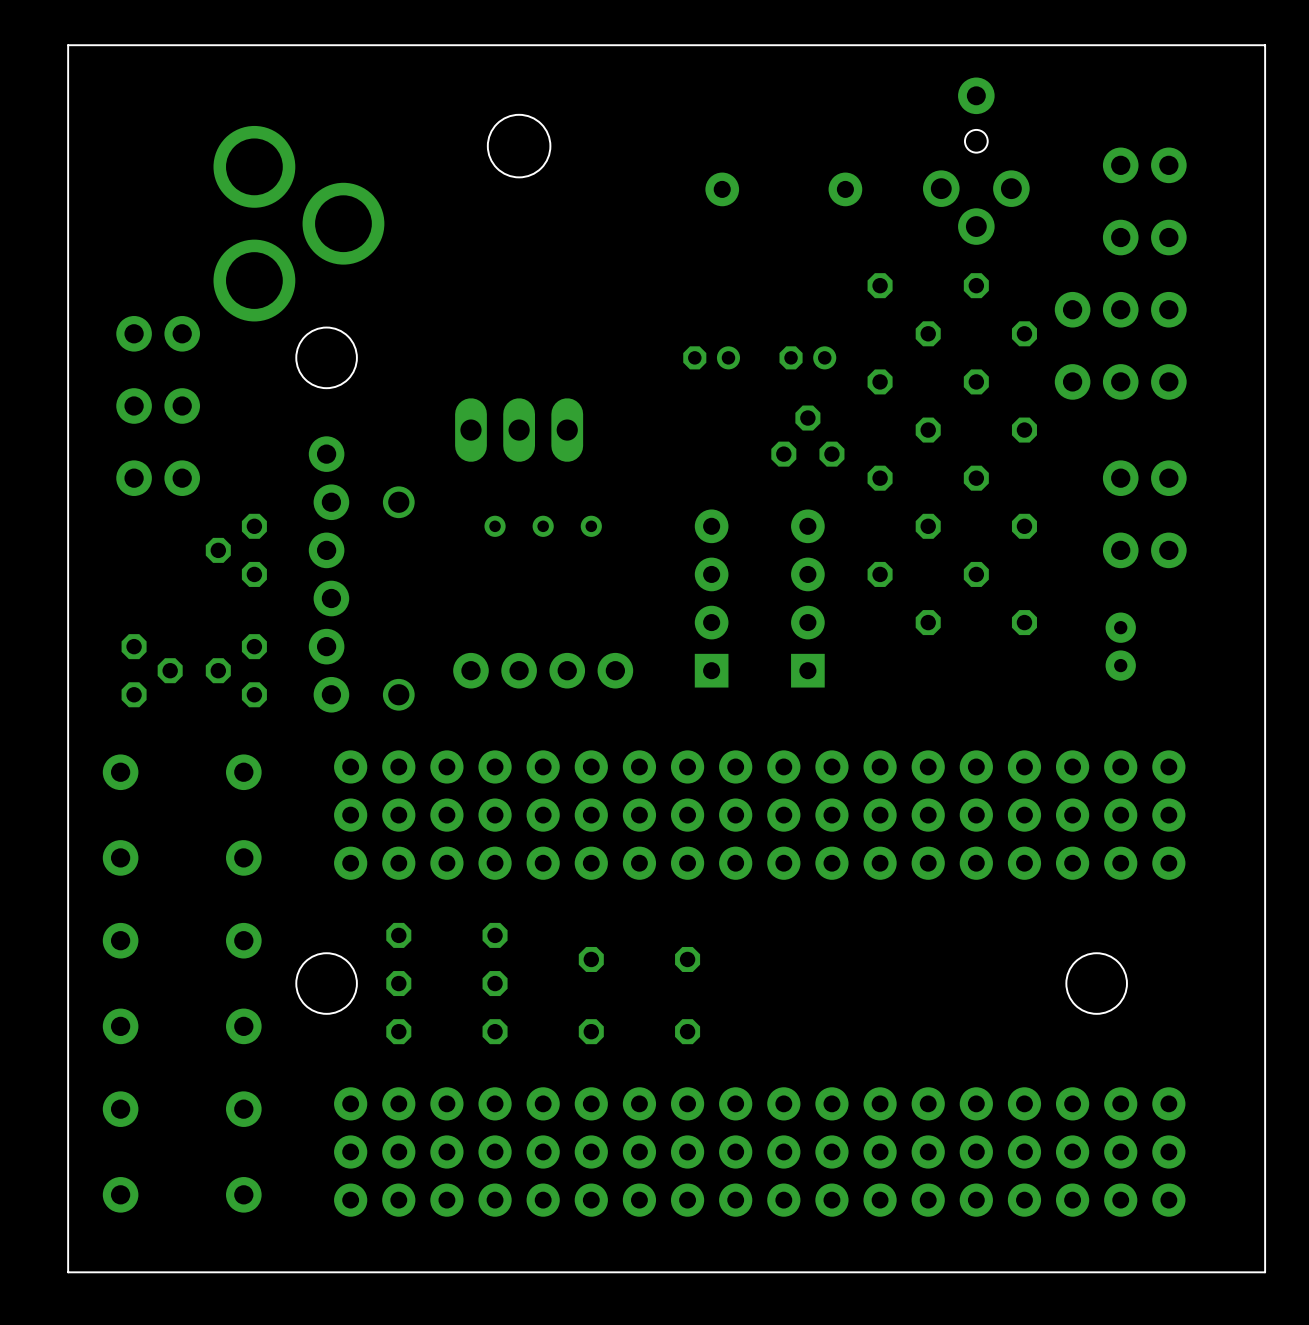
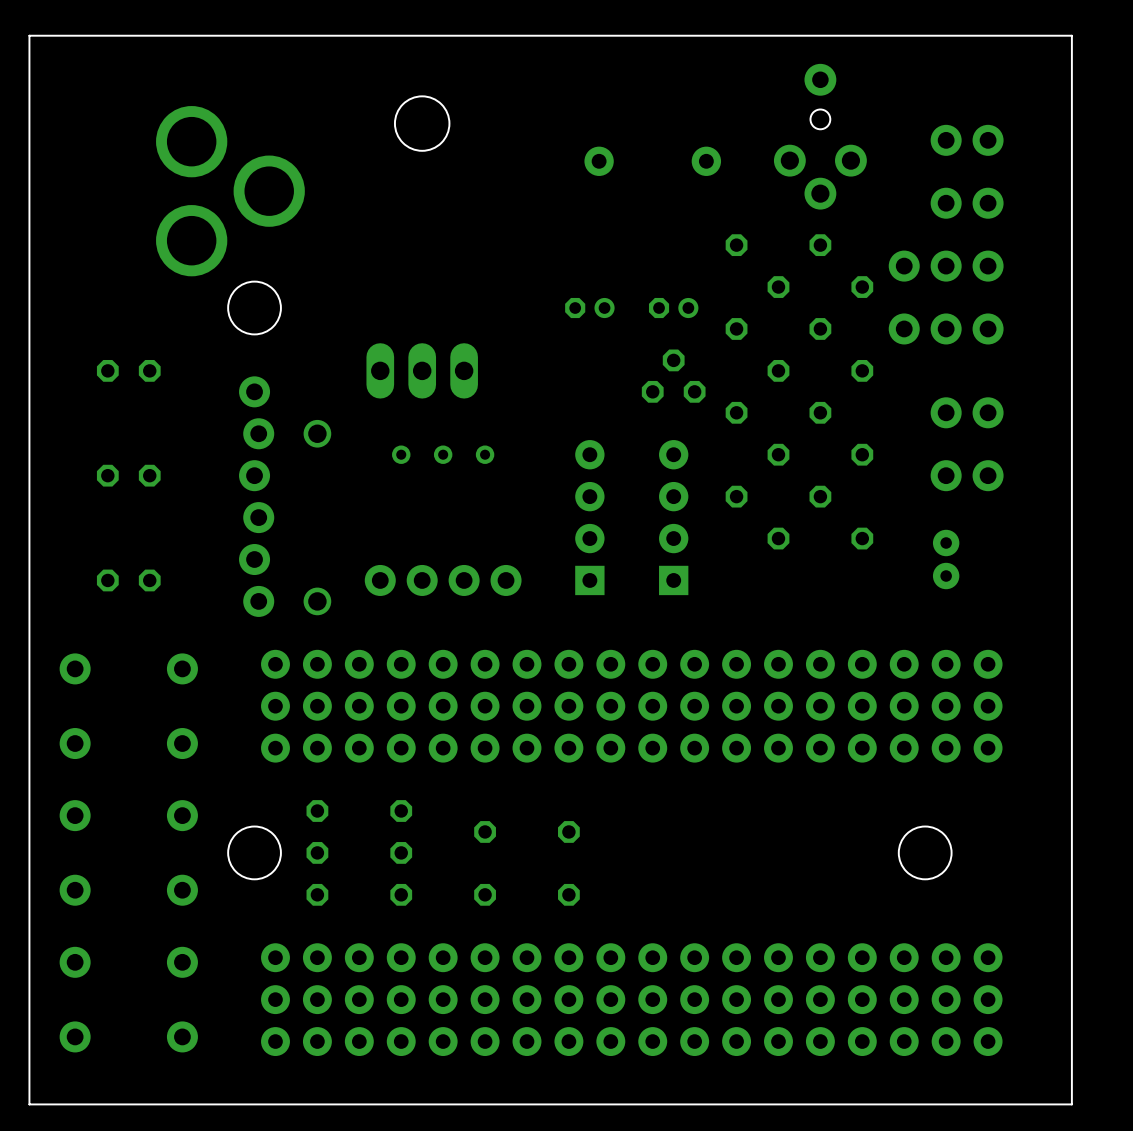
part: (158, 333) -> none
part: (158, 405) -> none
part: none -> (128, 370)
part: (158, 478) -> none
part: none -> (128, 475)
part: (236, 550) -> none
part: (152, 670) -> none
part: none -> (128, 580)
part: (236, 670) -> none

